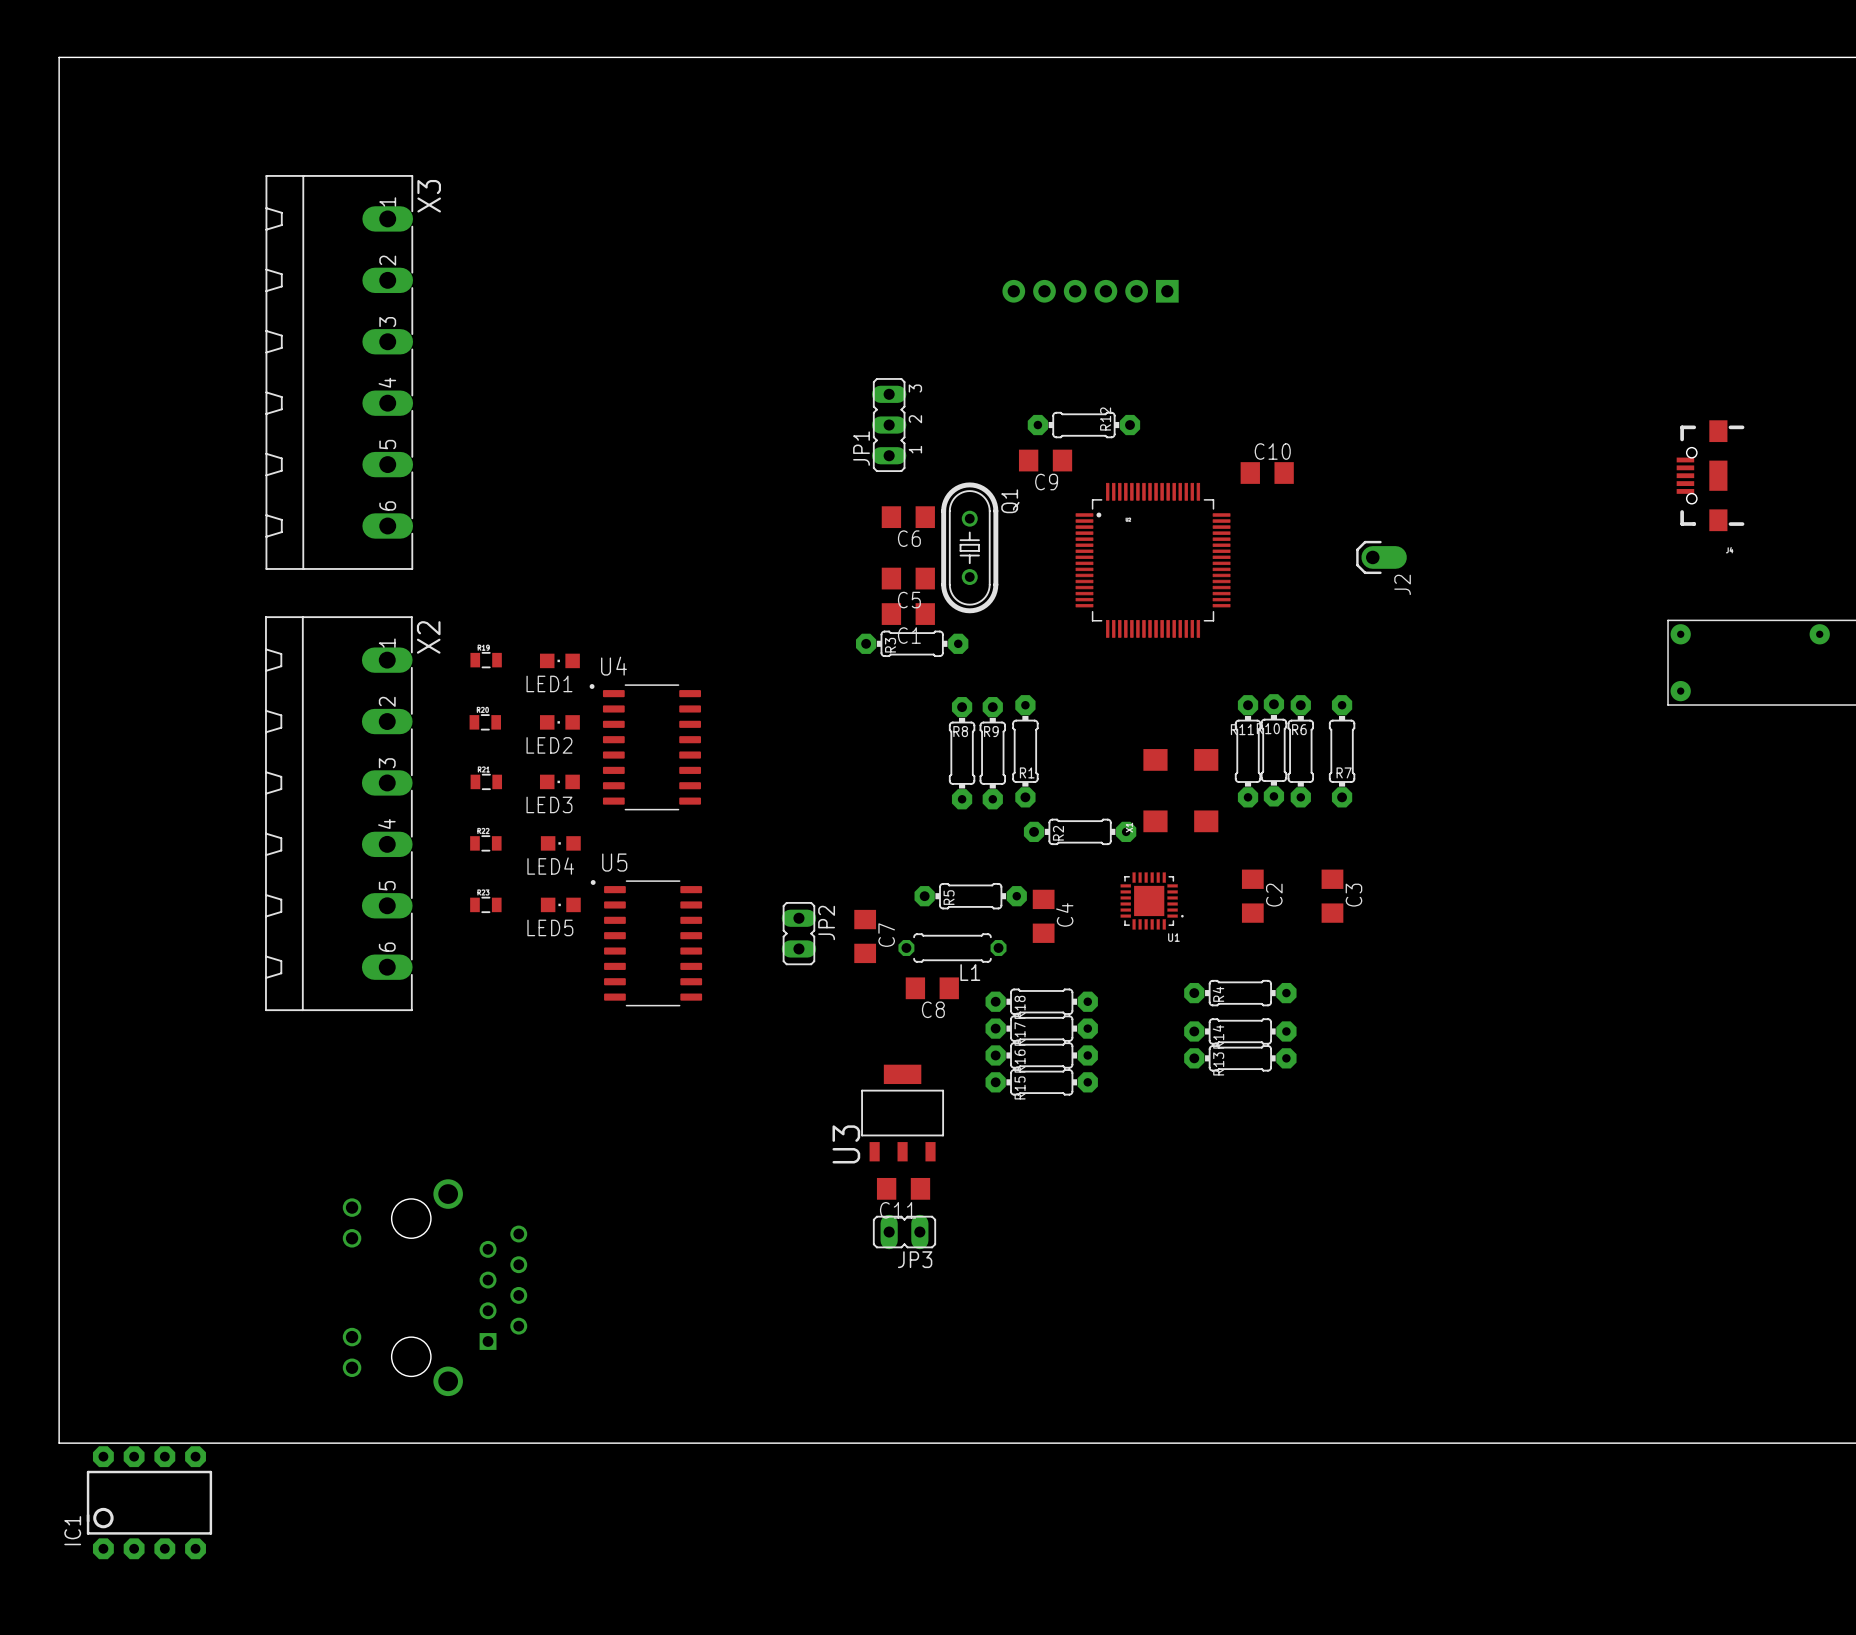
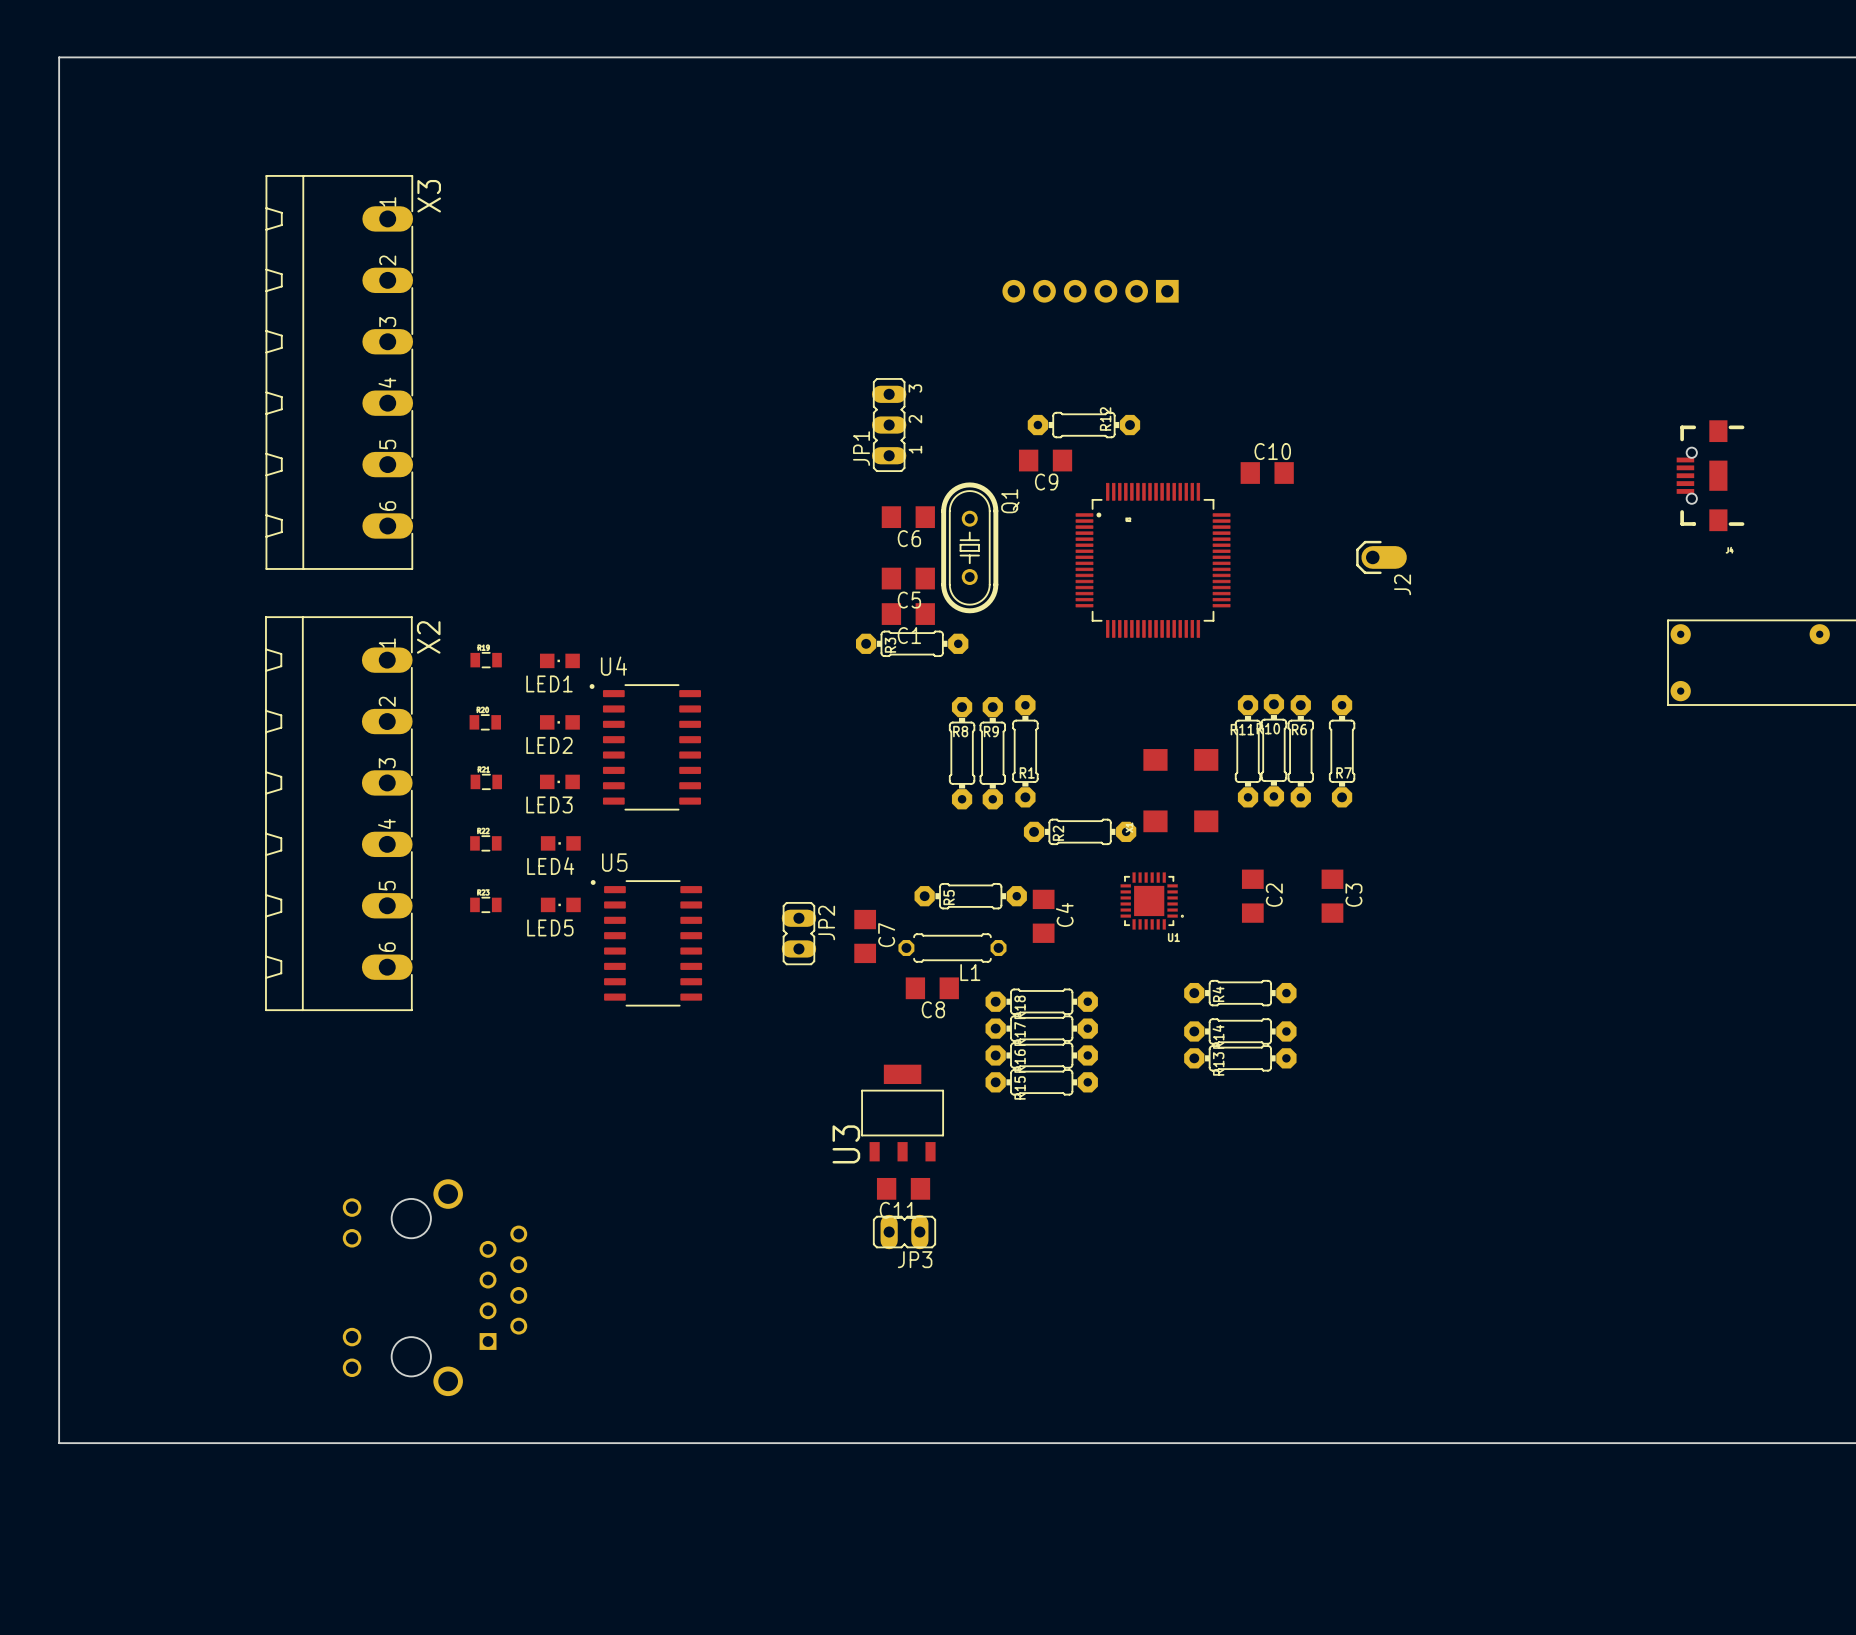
IC1: (149, 1502) -> none

